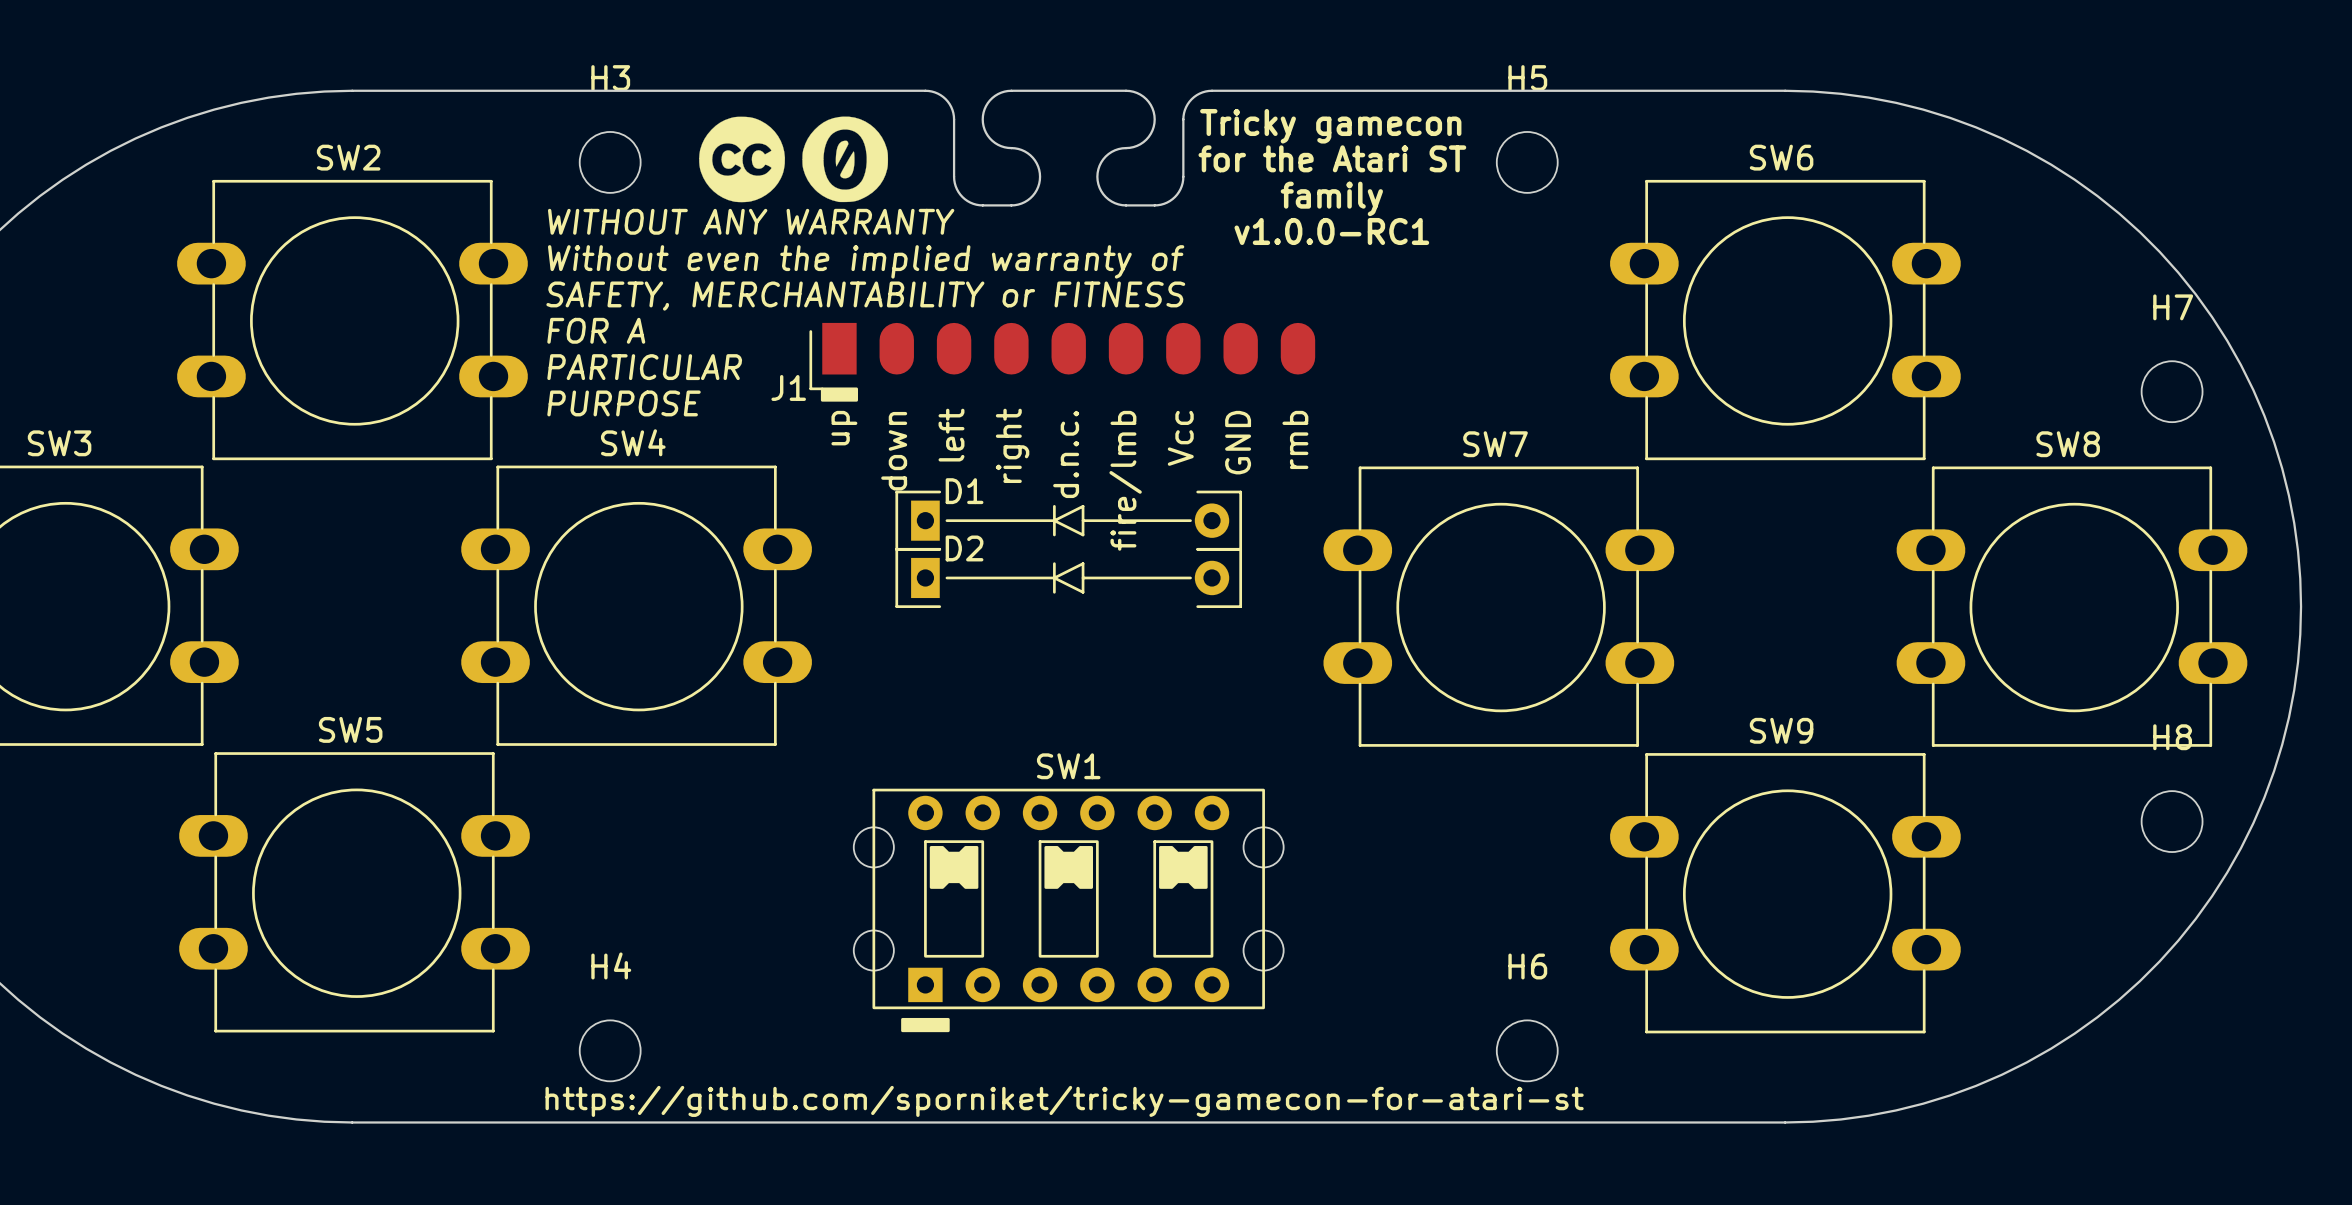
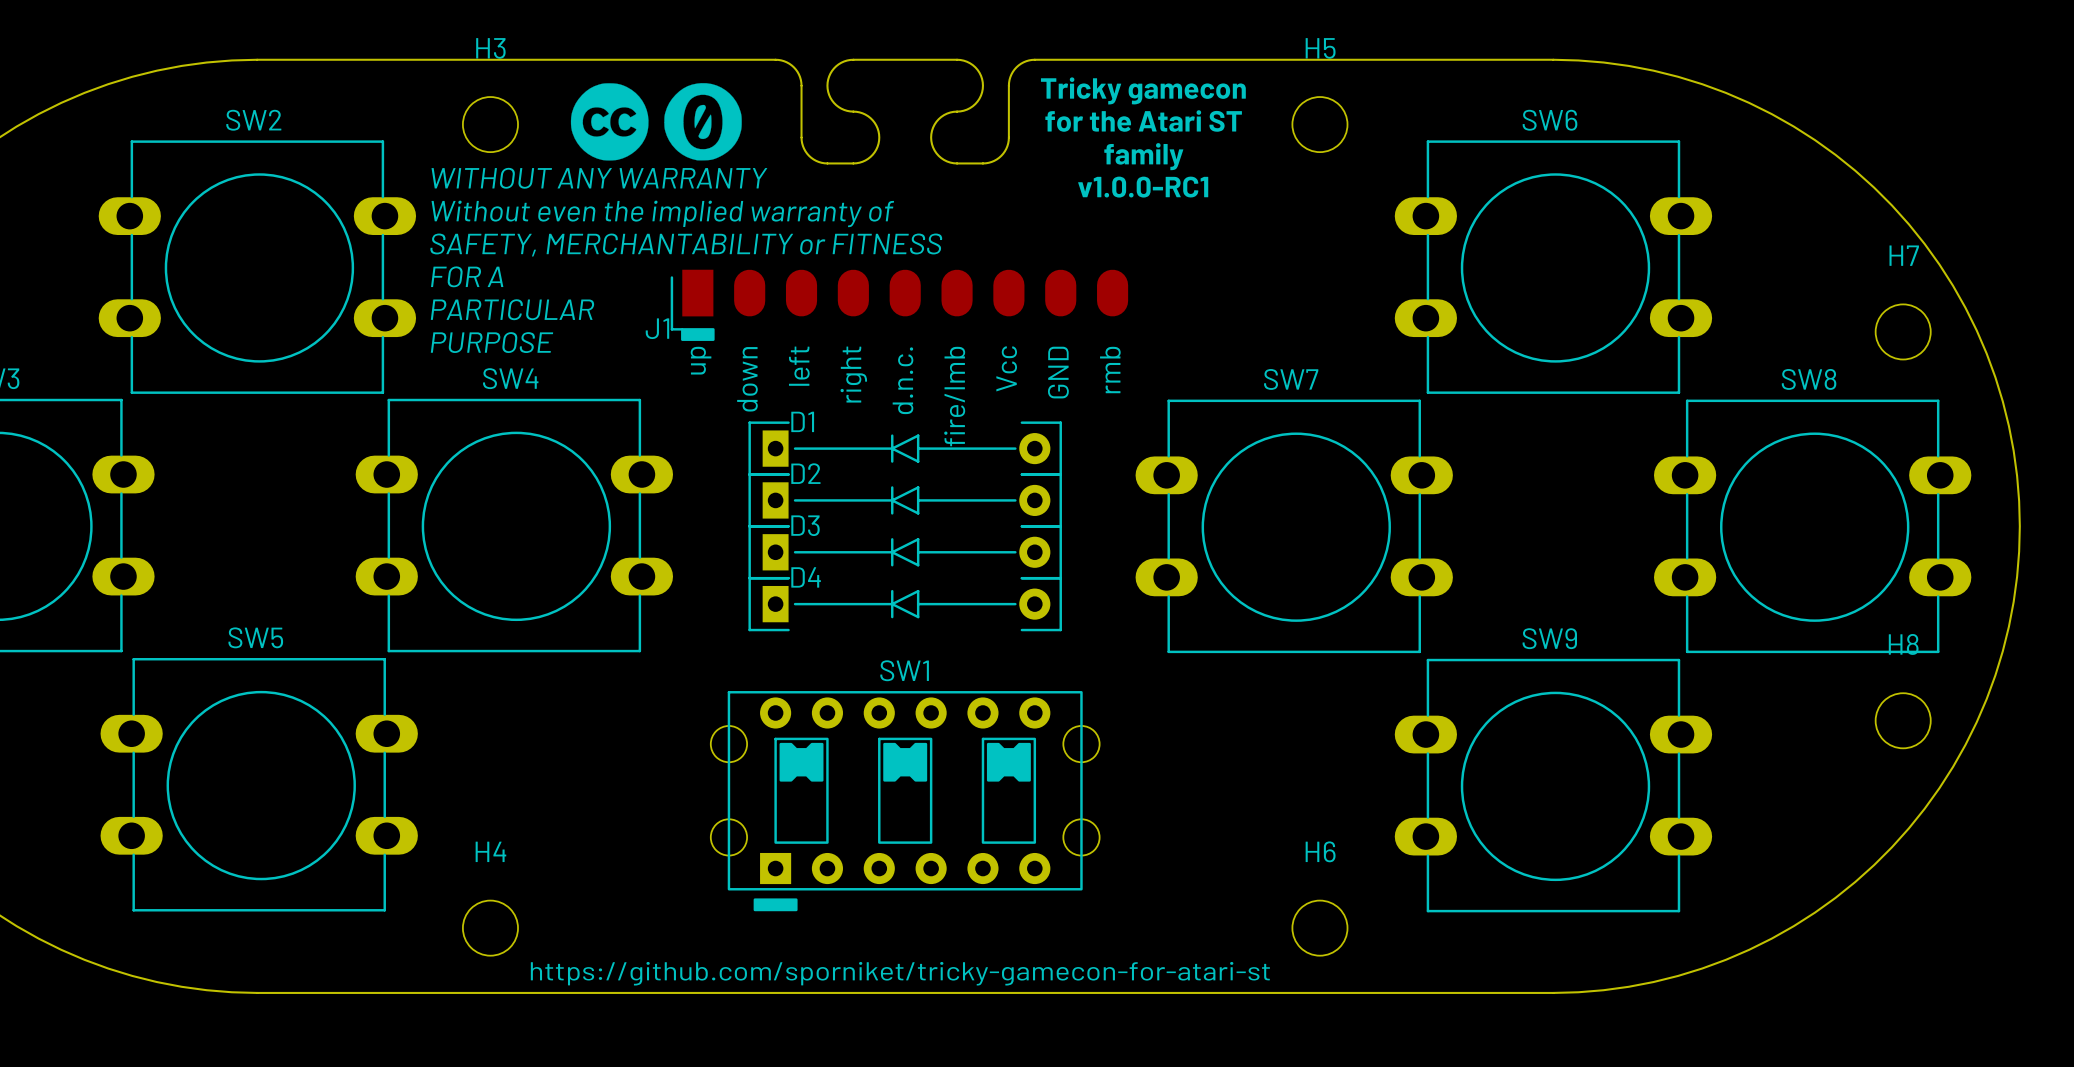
D3: none -> (905, 552)
D4: none -> (905, 604)

